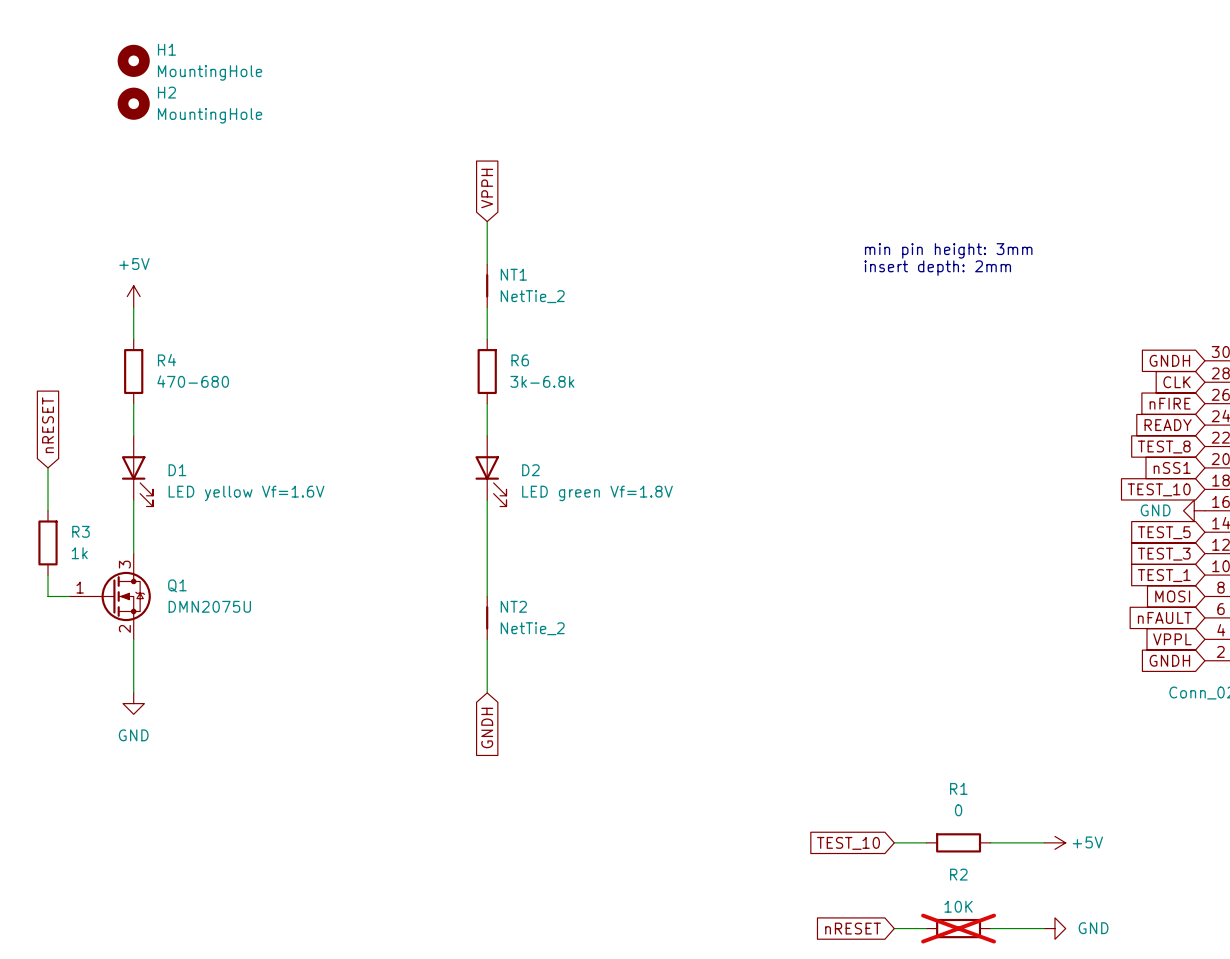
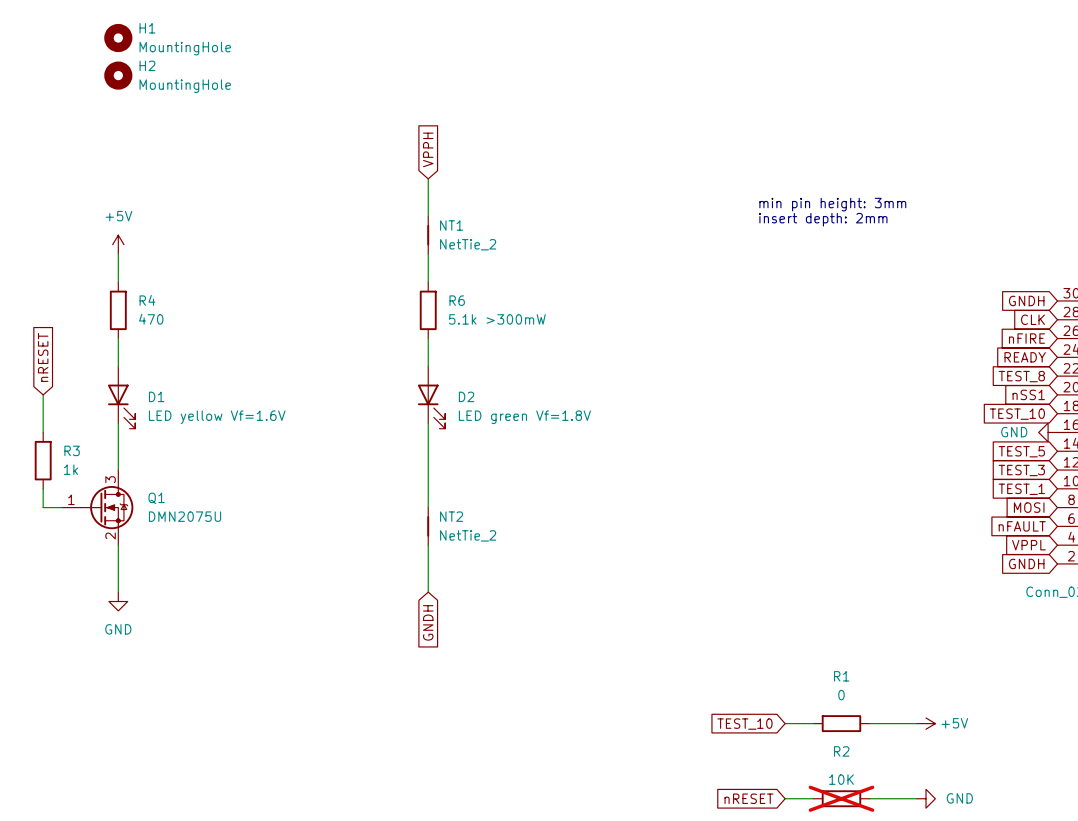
R4 value: 470-680 (193, 381) -> 470 (151, 319)
R6 value: 3k-6.8k (542, 381) -> 5.1k >300mW (497, 319)

